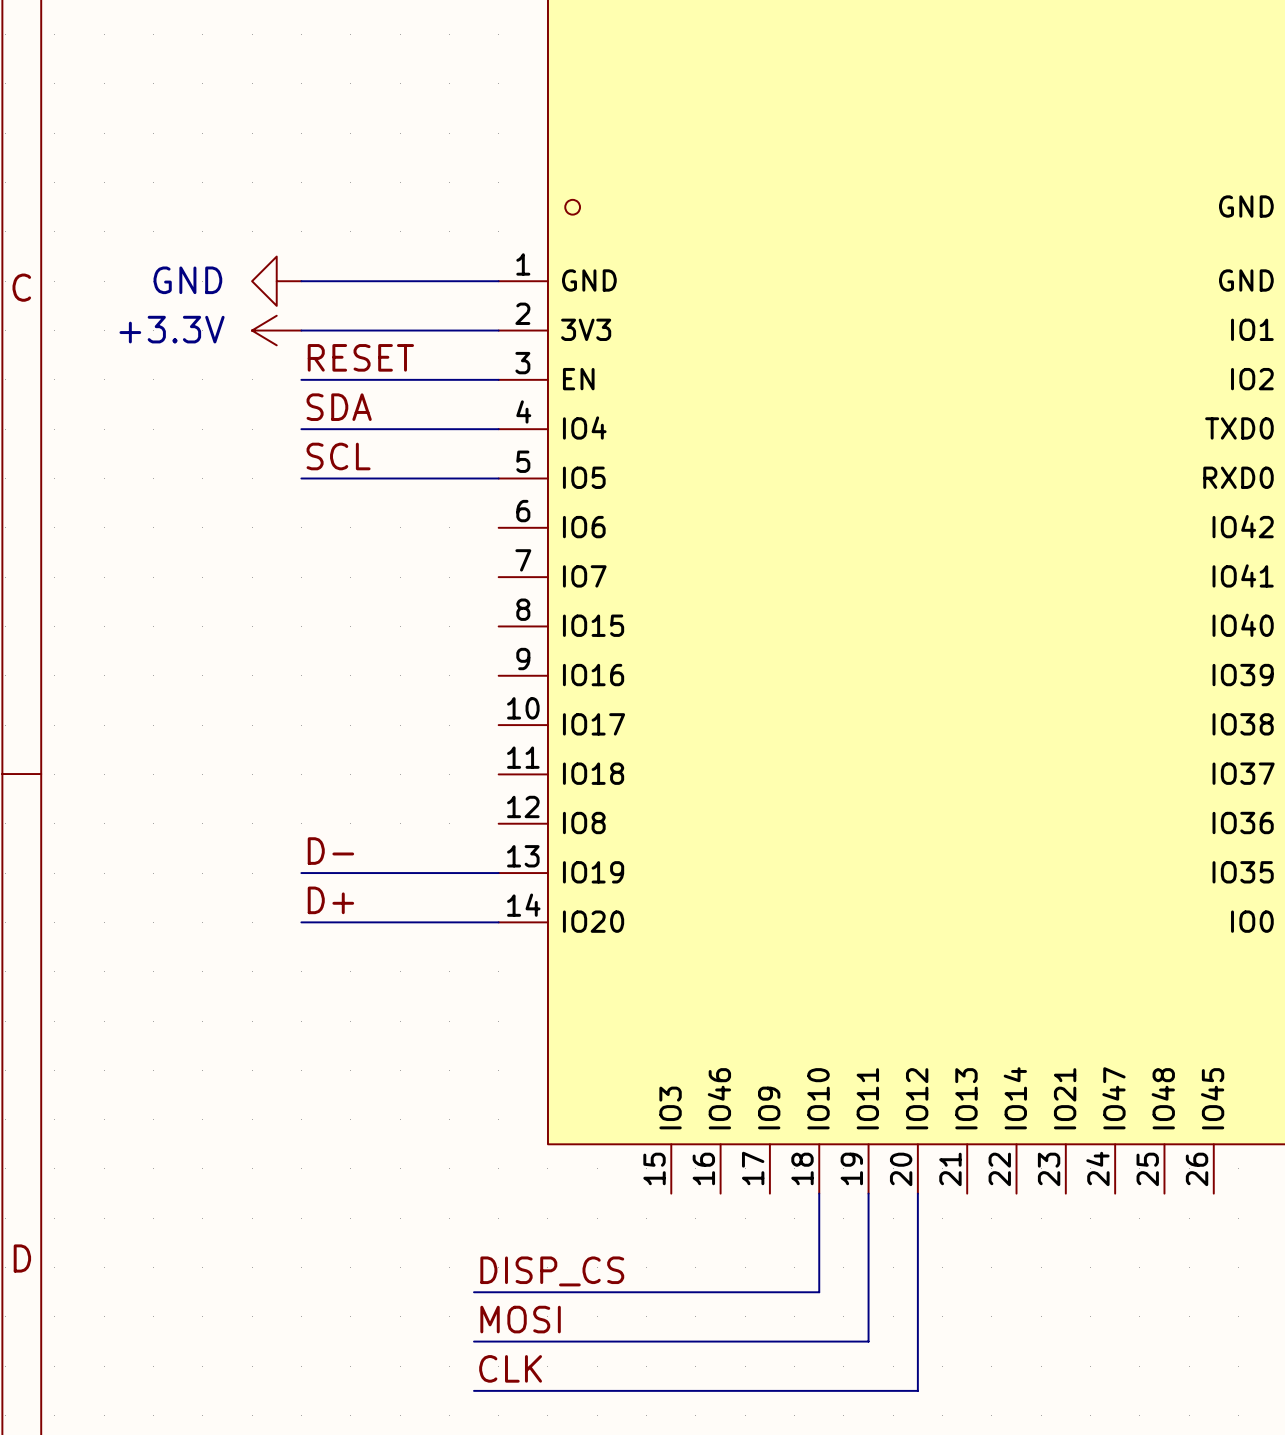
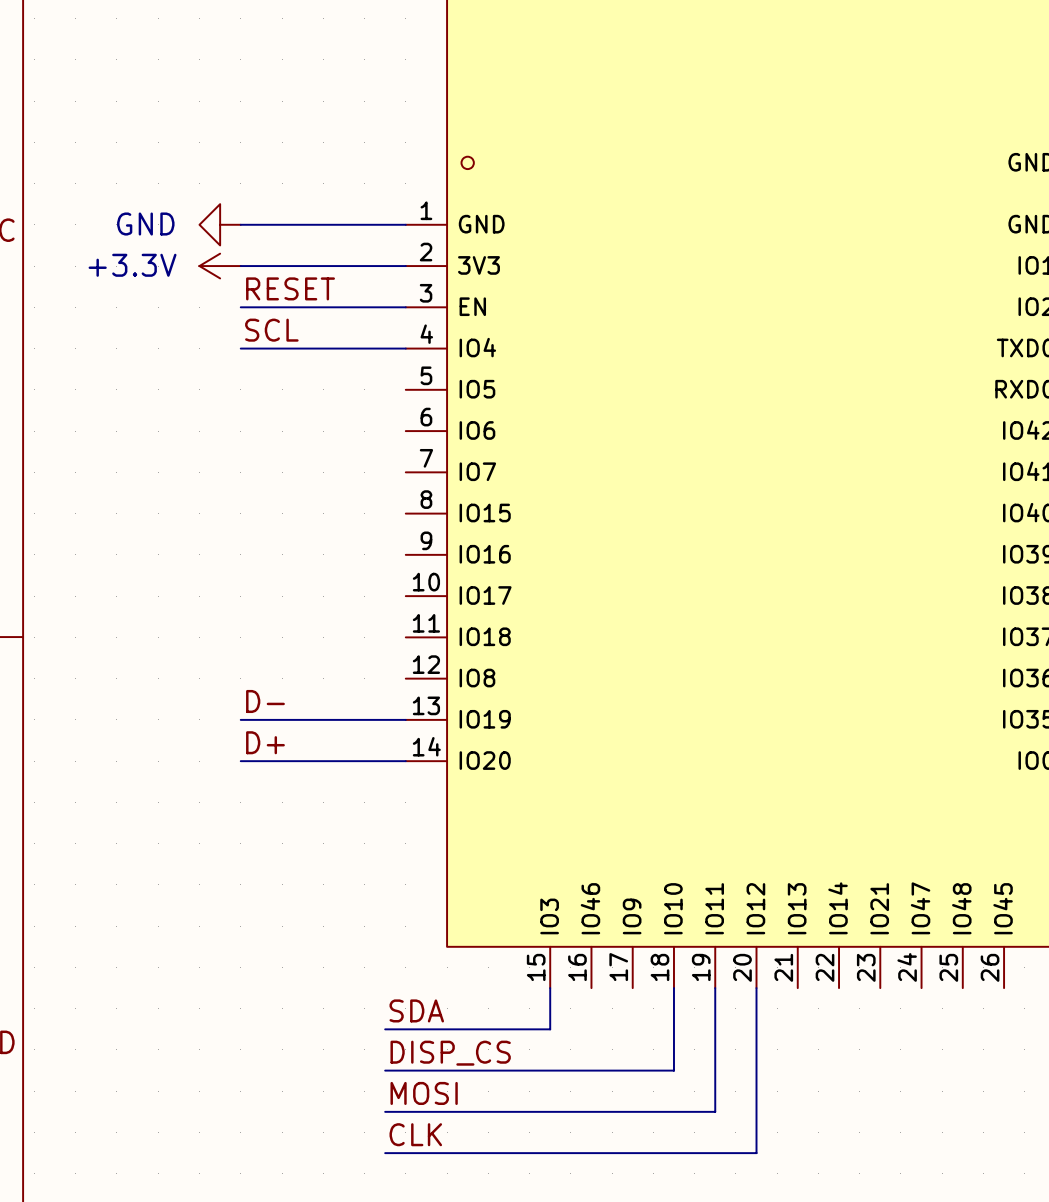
label: SDA (339, 407) -> SCL (271, 330)
label: SCL (338, 456) -> none
wire: (301, 478) (498, 478) -> none
wire: none -> (550, 988) (550, 1029) (385, 1029)
label: none -> SDA (416, 1010)

